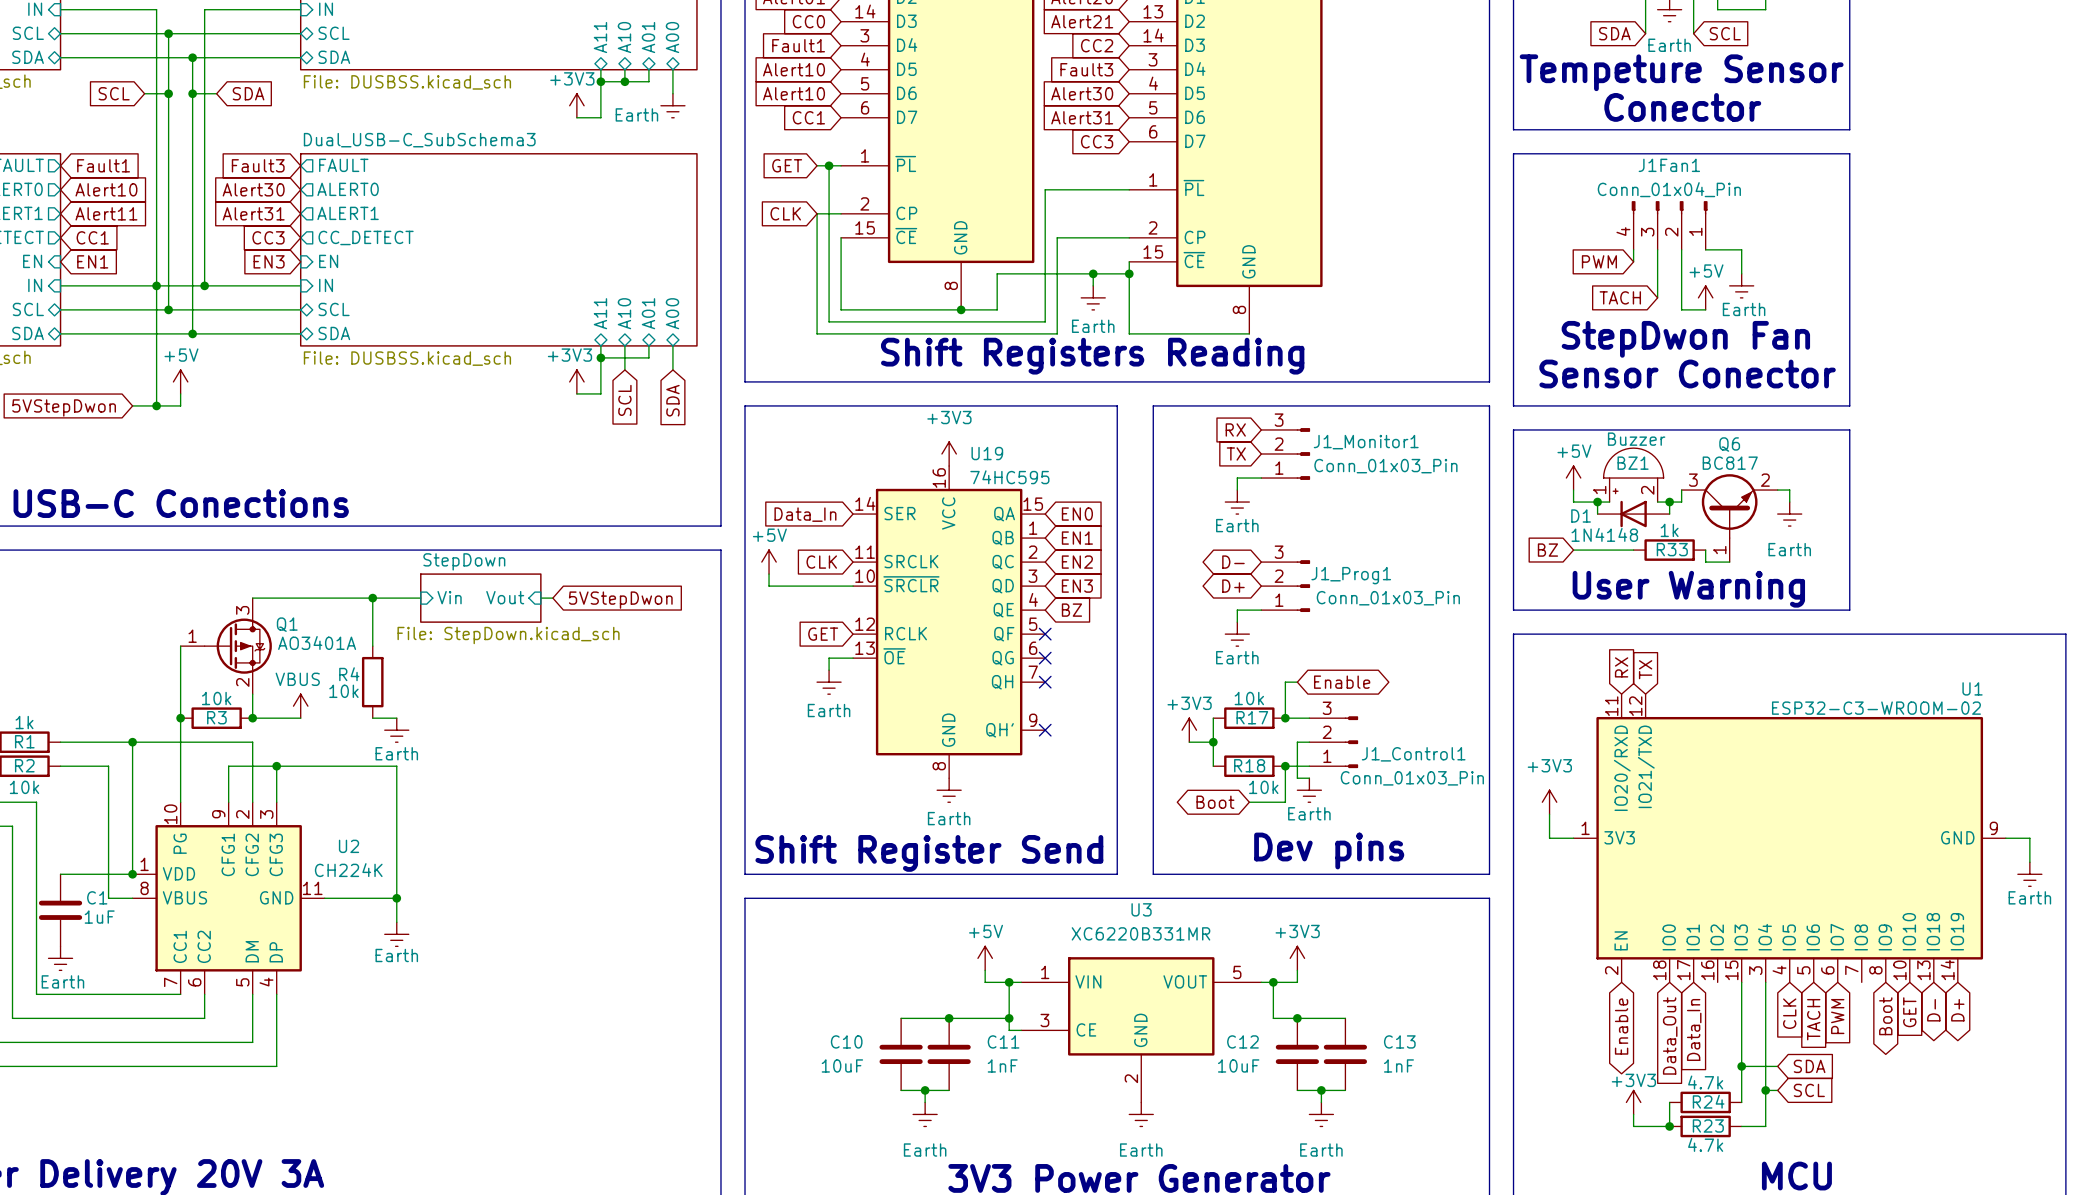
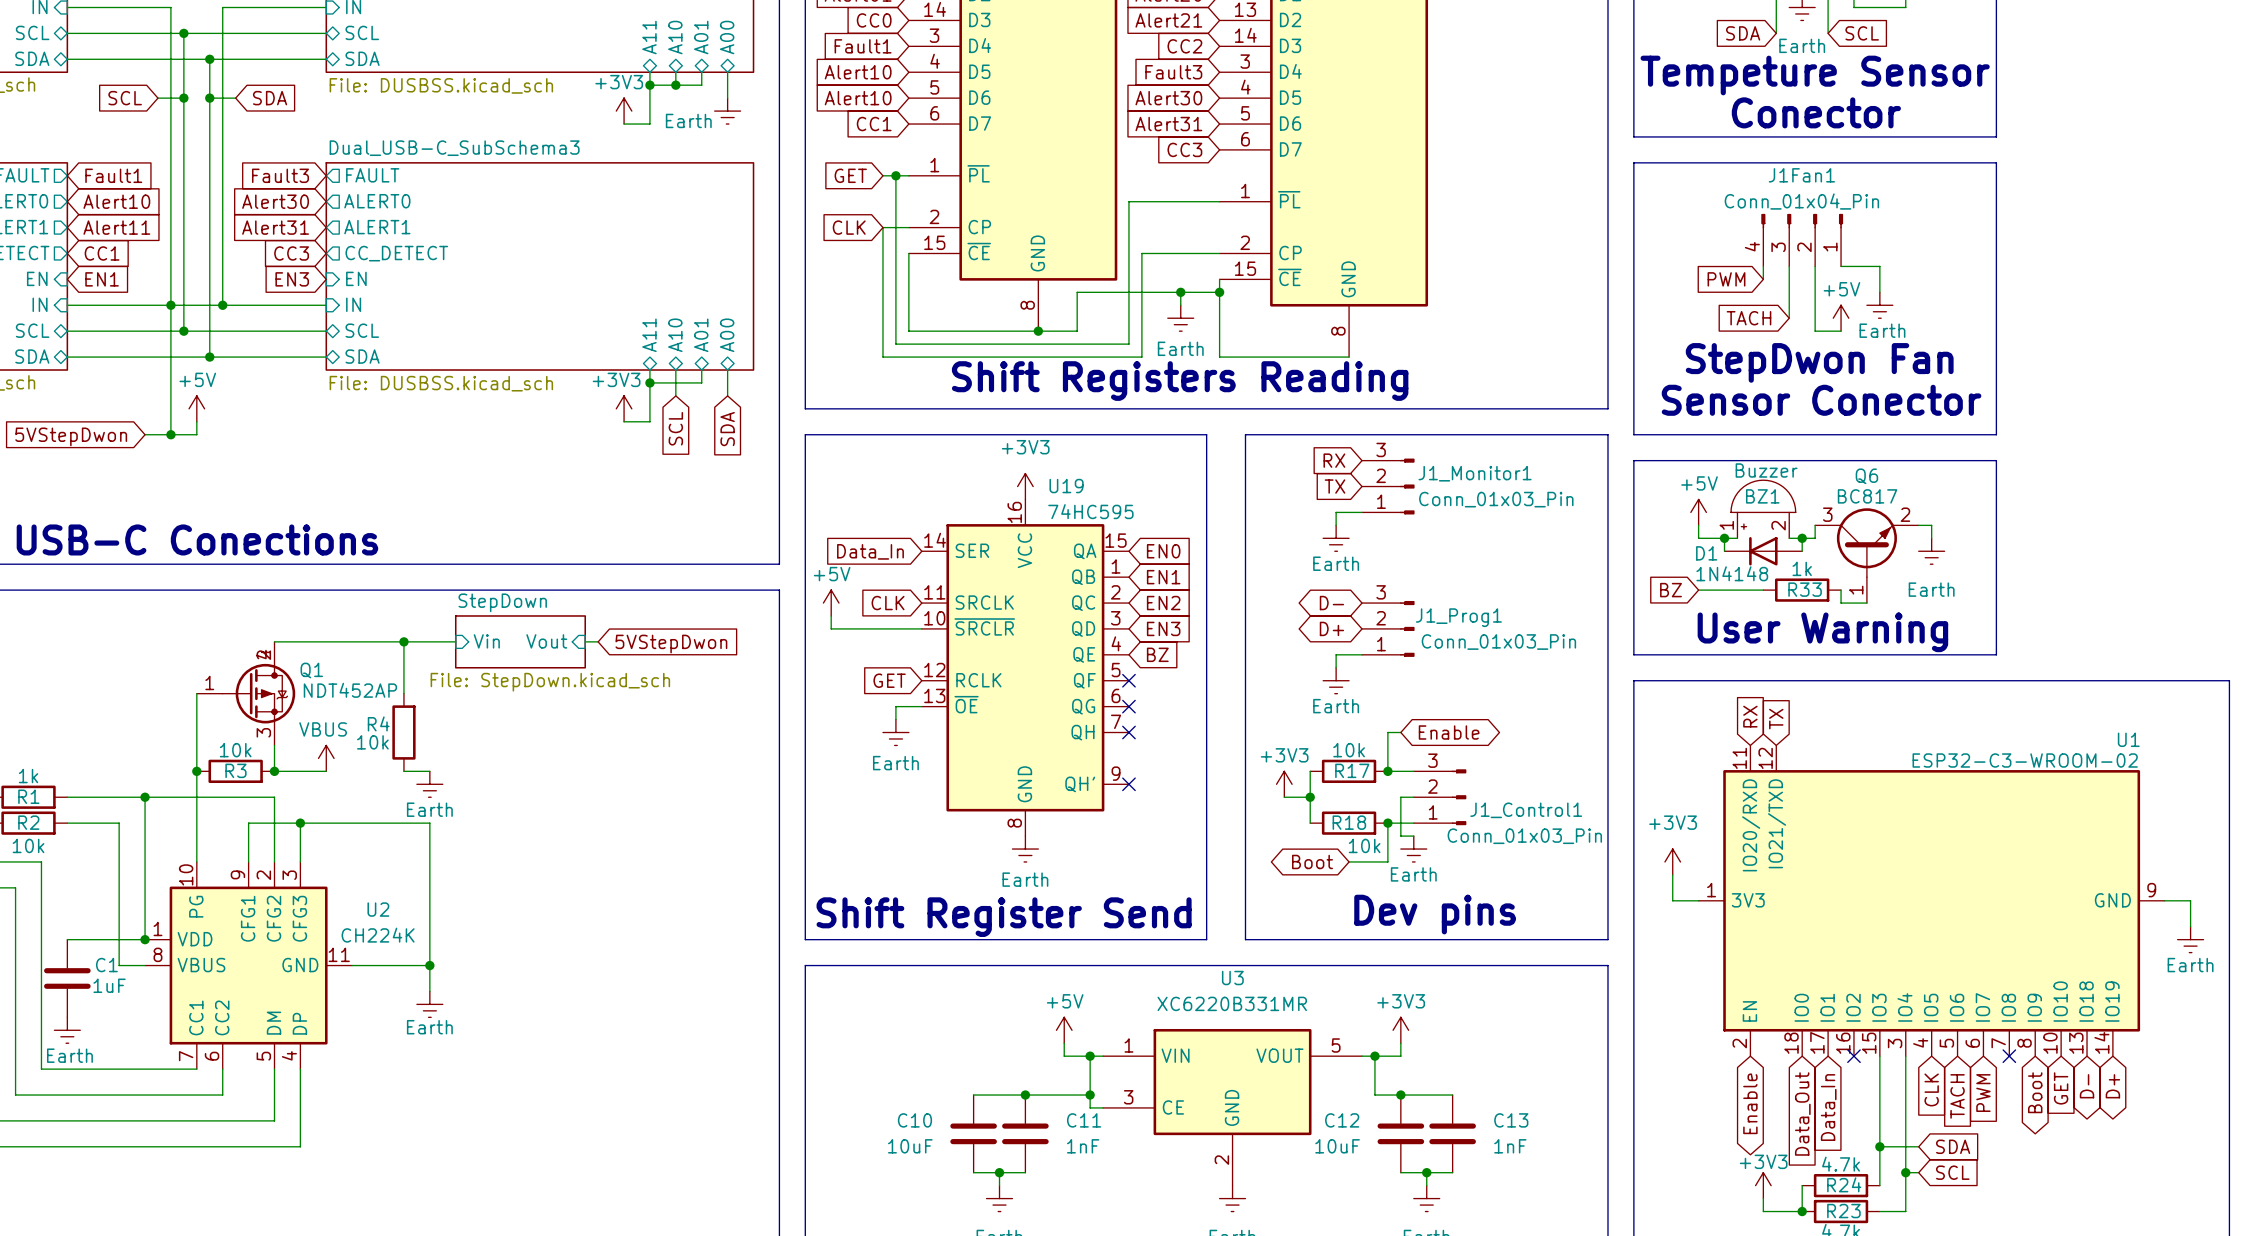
Q1 symbol: [180, 598, 272, 695] -> [196, 641, 296, 746]
Q1 value: AO3401A (317, 642) -> NDT452AP (350, 690)
no-connect mark: none -> (1853, 1056)
no-connect mark: none -> (2009, 1056)

